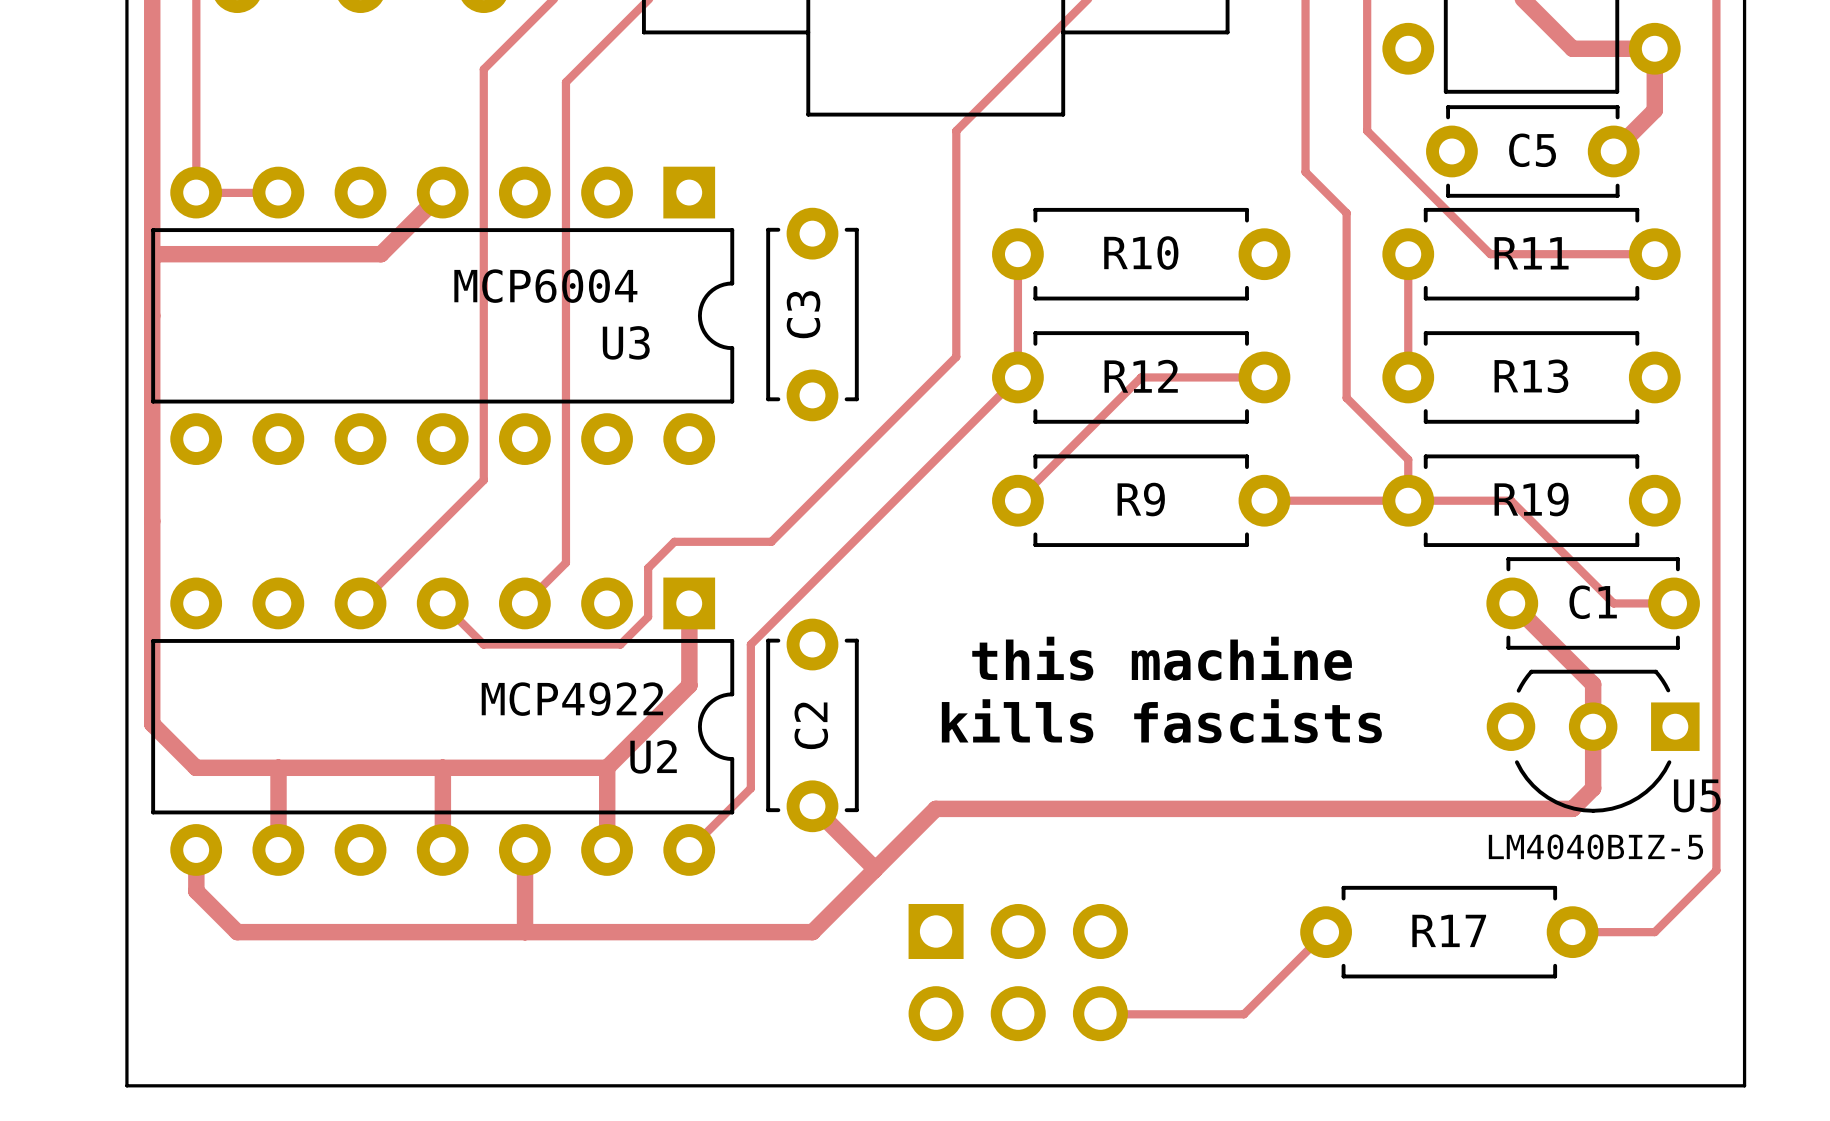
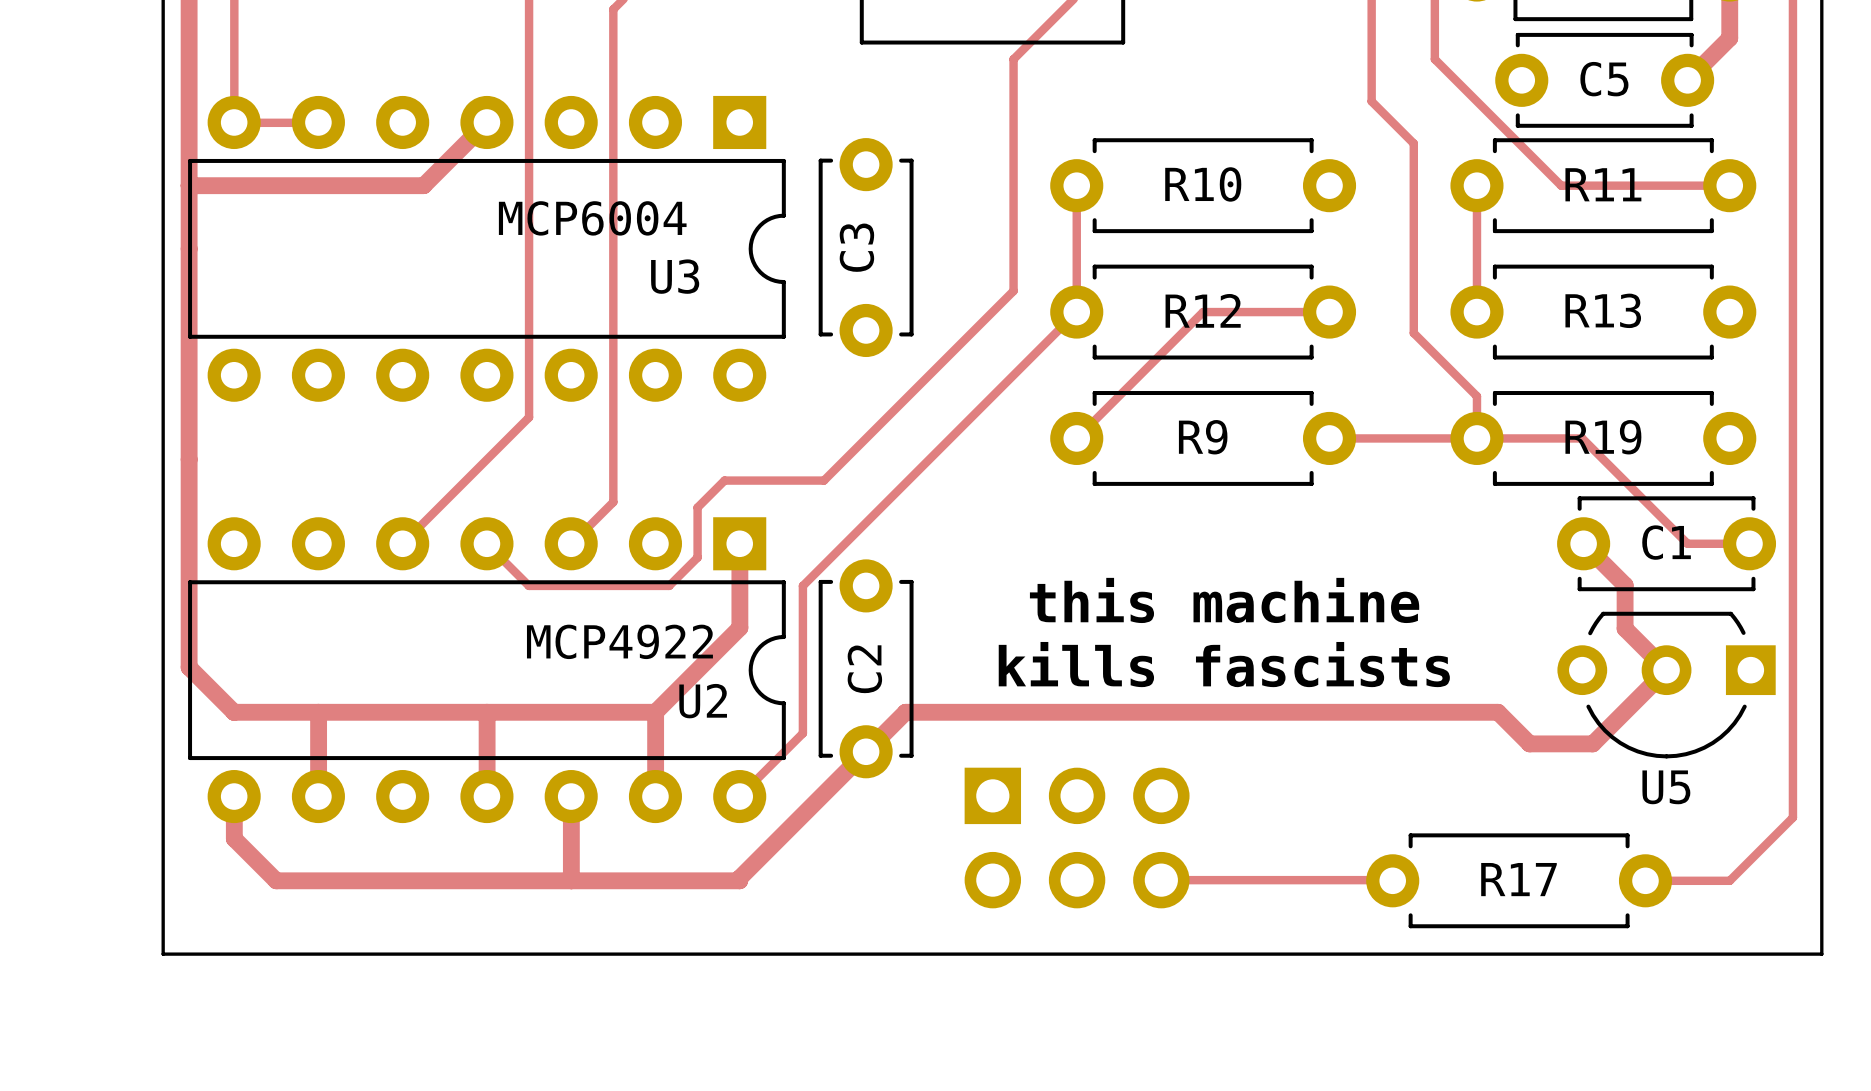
track: (1552, 643) (1593, 684) (1593, 788) (1572, 808) (935, 808) (812, 932) (689, 932) -> (1625, 585) (1625, 628) (1666, 670) (1592, 743) (1529, 743) (1498, 712) (905, 712) (739, 878) (739, 880)
U5 name position: U5 (1697, 795) -> U5 (1666, 787)
track: (812, 806) (874, 867) (874, 870) -> none
U5 value: LM4040BIZ-5 (1595, 847) -> none
track: (1326, 932) (1243, 1014) (1100, 1014) -> (1392, 880) (1161, 880)
part position: (1018, 972) -> (1077, 838)
board edge: (126, 1003) (126, 1085) (1744, 1085) (1744, 1003) -> (163, 954) (1821, 954)

